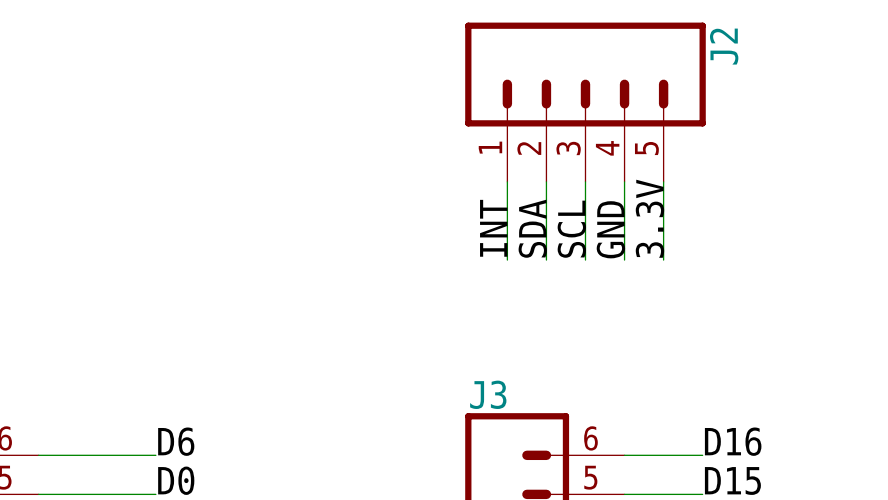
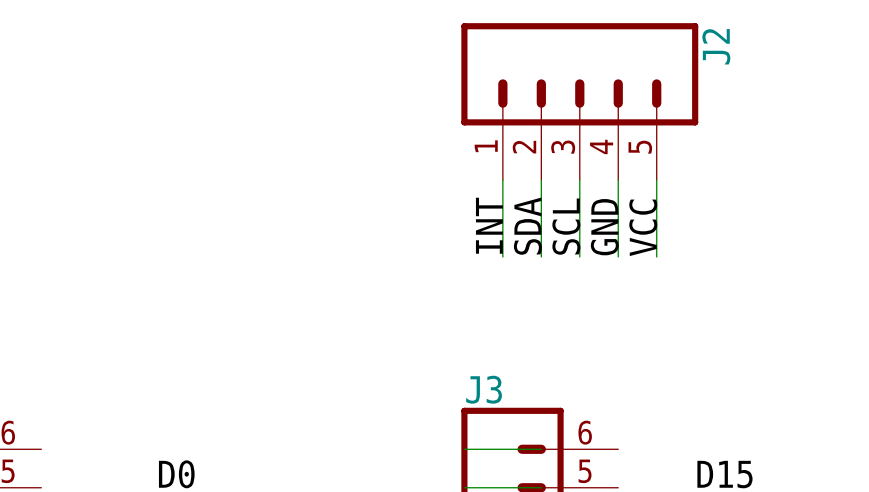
label: 3.3V (649, 218) -> VCC (643, 227)
label: D6 (176, 441) -> none
label: D16 (733, 441) -> none
wire: (38, 455) (155, 455) -> none
wire: (624, 455) (702, 455) -> (464, 449) (541, 449)
wire: (38, 494) (155, 494) -> none
wire: (624, 494) (702, 494) -> (464, 487) (541, 487)

